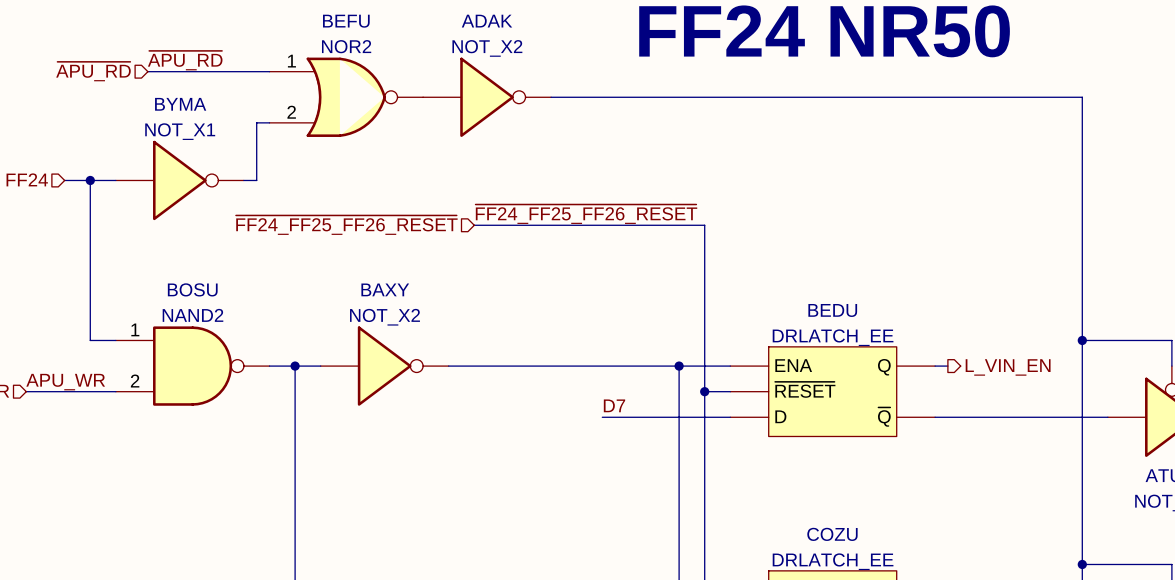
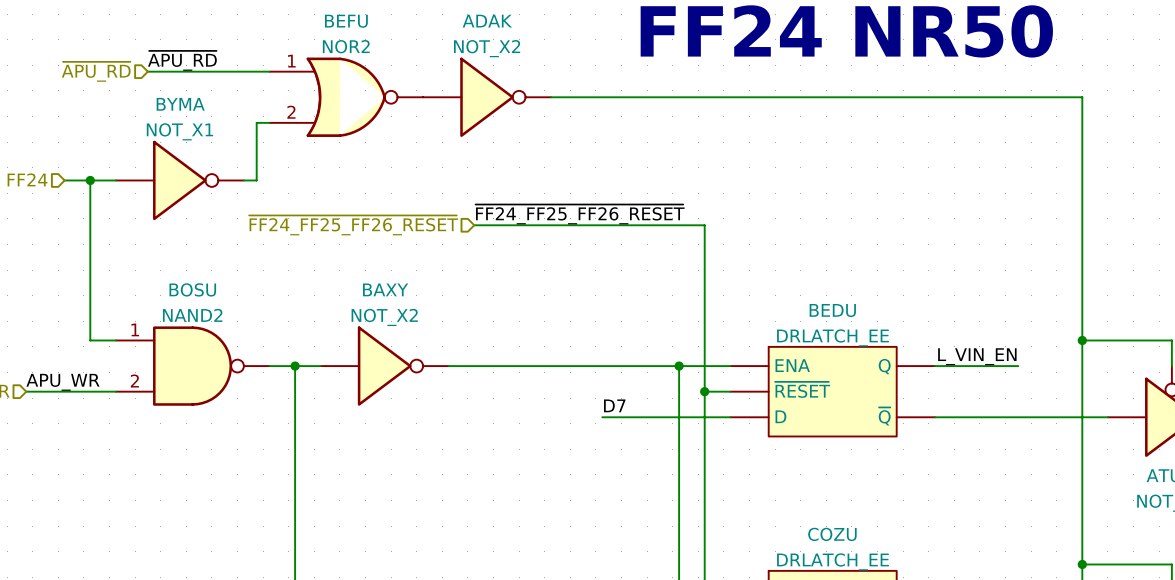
label: none -> L_VIN_EN (977, 356)
wire: none -> (947, 366) (1018, 366)
hierarchical label: L_VIN_EN (1008, 367) -> none

